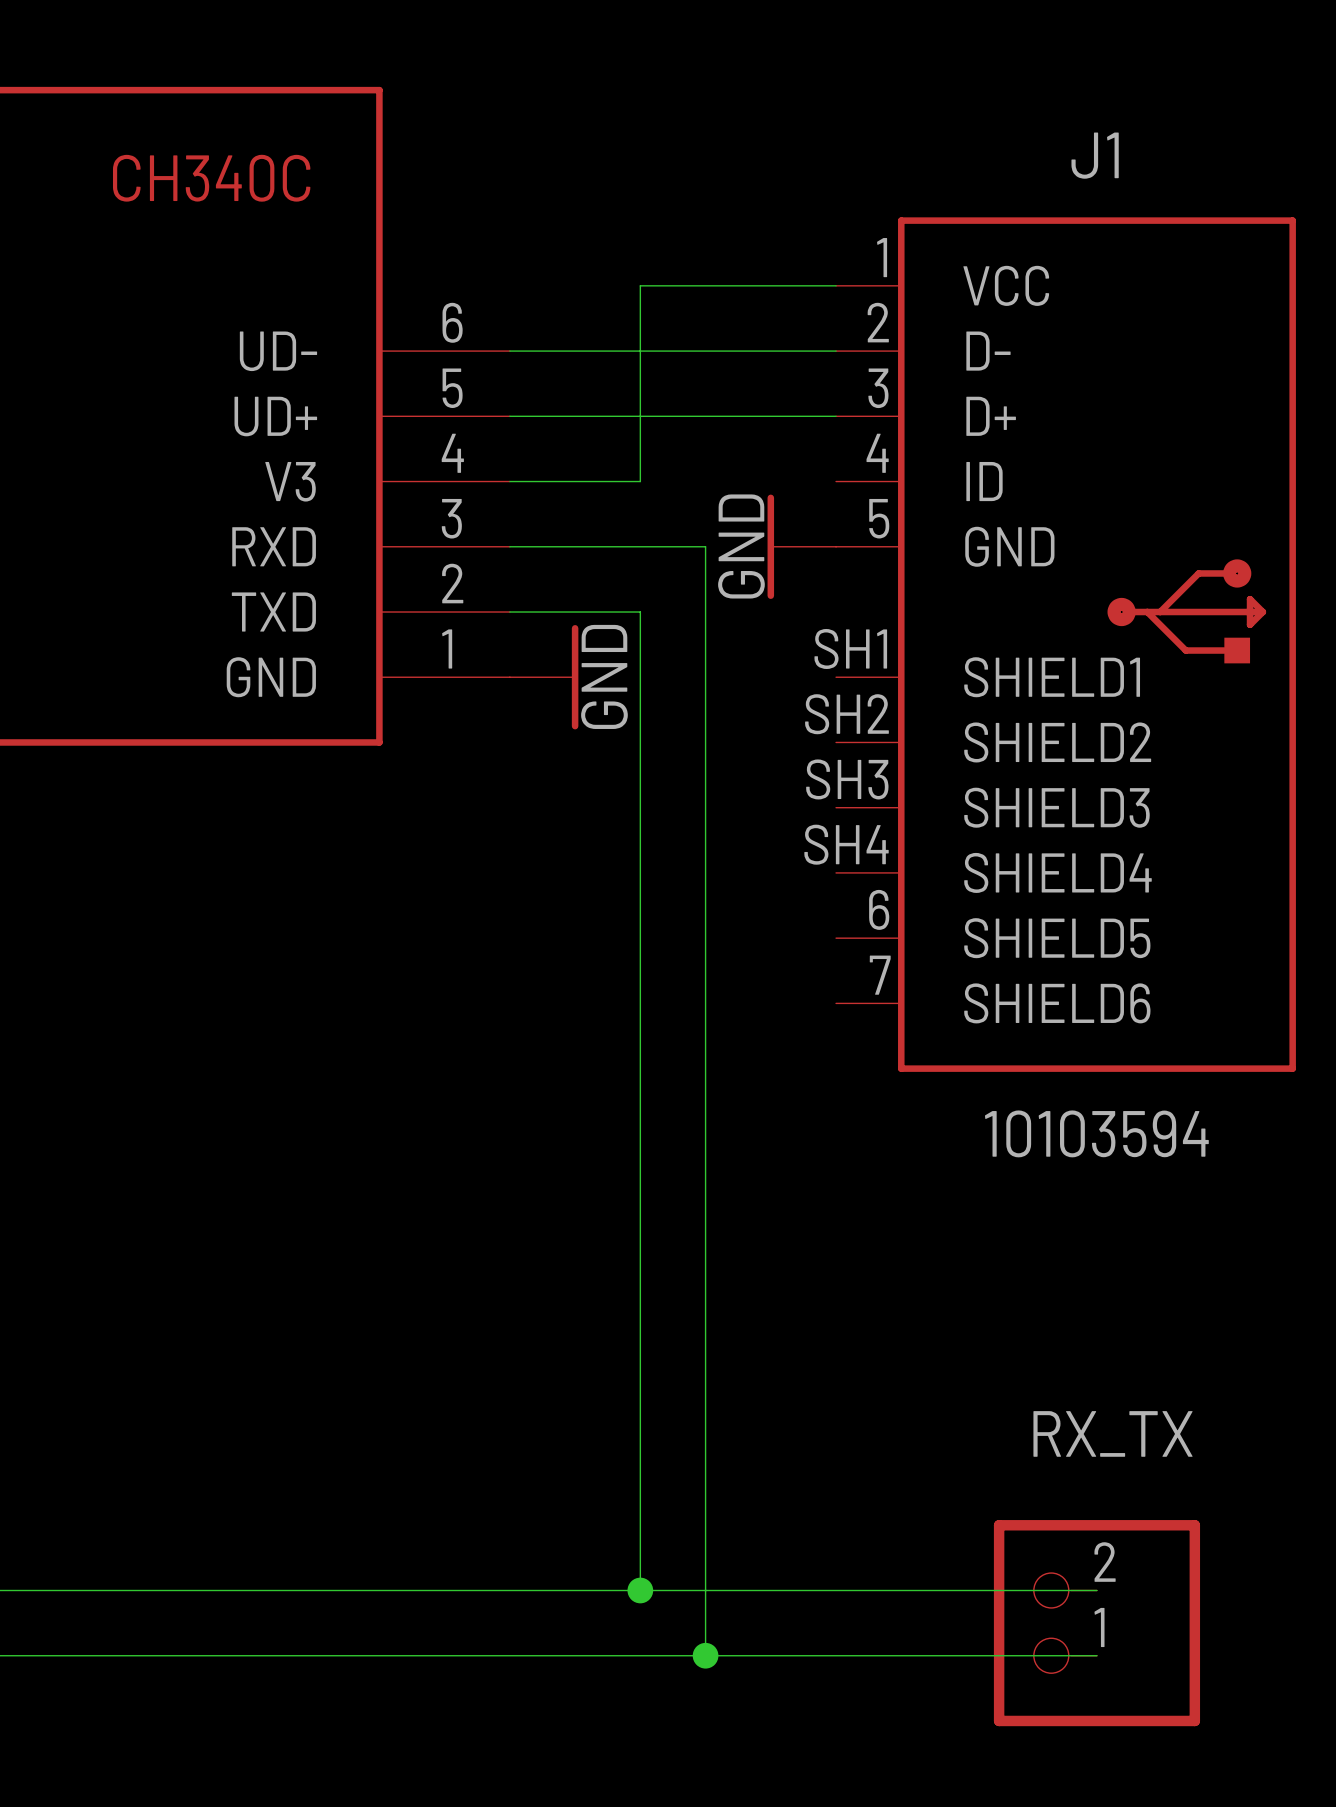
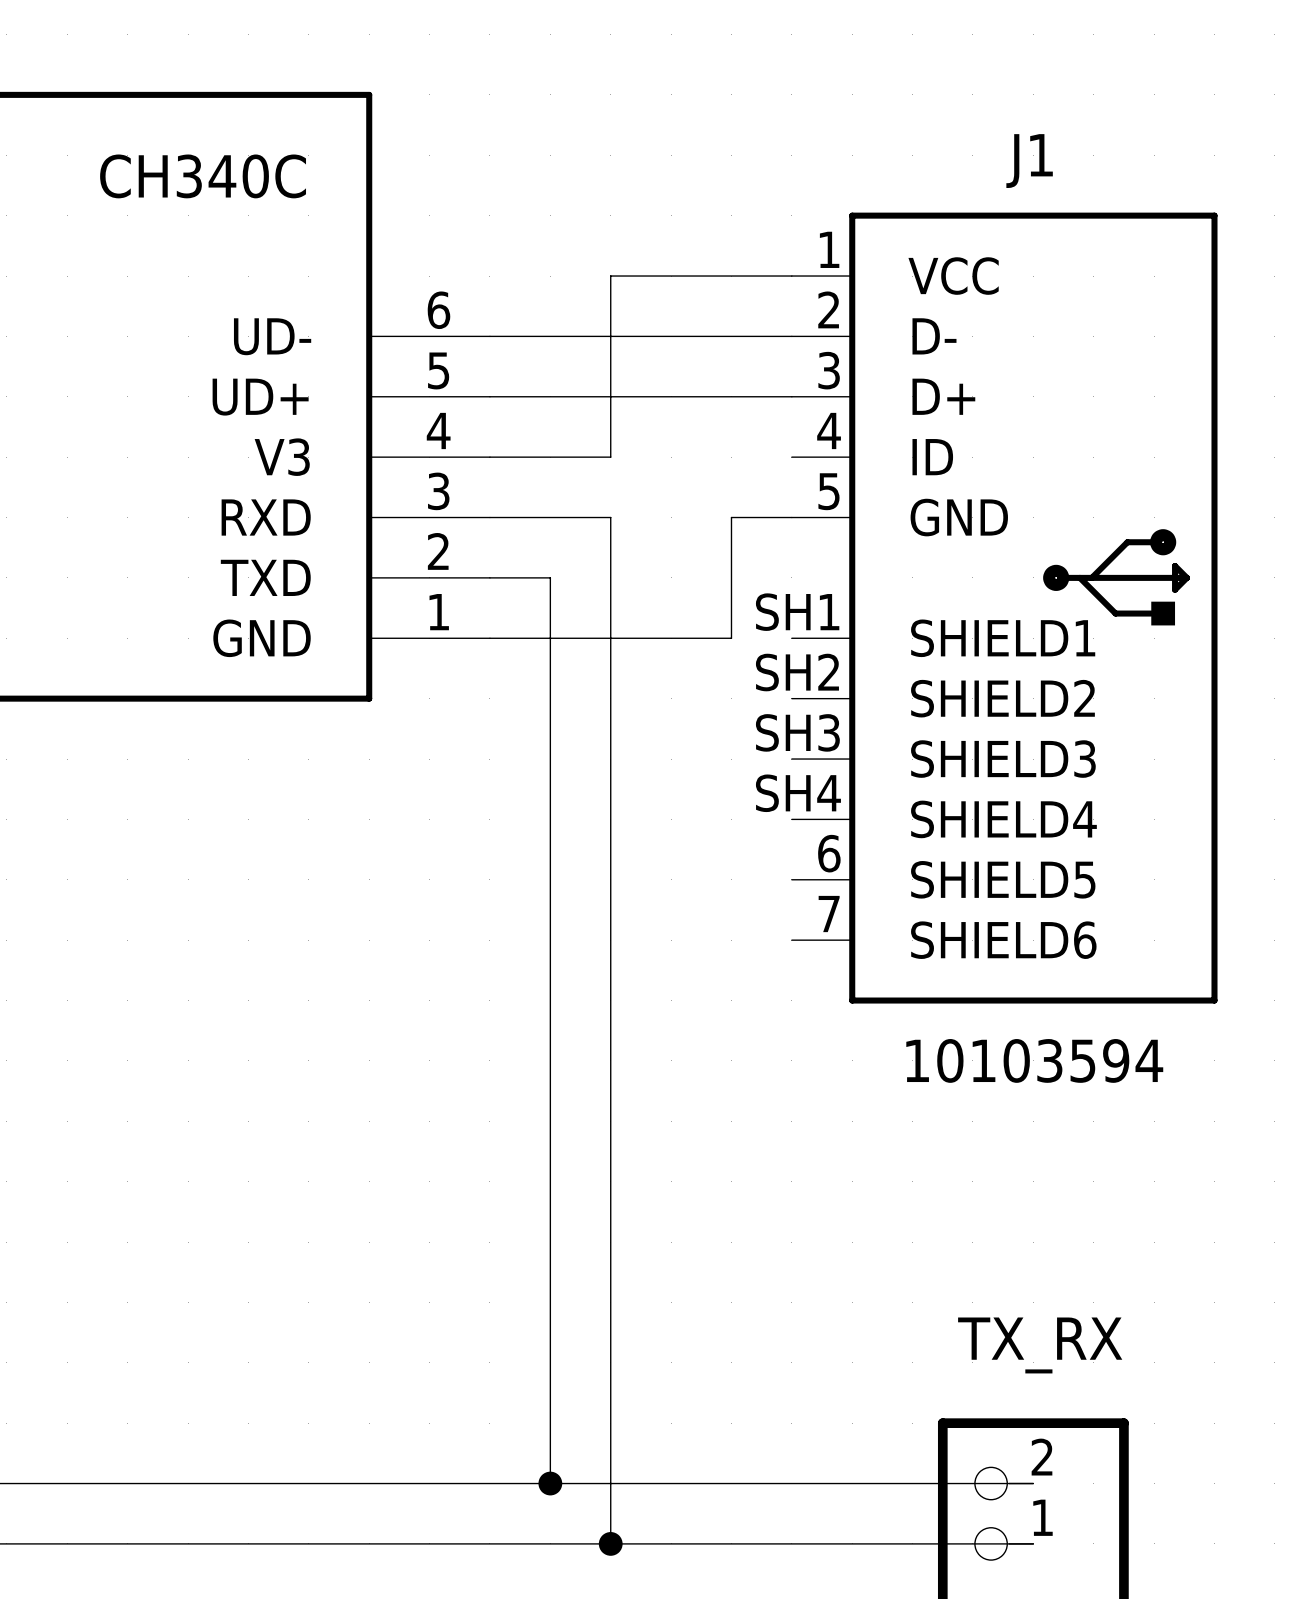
wire: (640, 546) (705, 546) (705, 1655) -> none
power symbol: GND (801, 546) -> none
wire: none -> (791, 517) (731, 517) (731, 638) (489, 638)
wire: (575, 612) (640, 612) -> (610, 517) (610, 577)
wire: none -> (550, 577) (550, 1483)
power symbol: GND (544, 677) -> none
RX_TX name: RX_TX (1113, 1433) -> TX_RX (1040, 1345)
junction: none -> (550, 1483)
wire: none -> (610, 1483) (610, 1543)
junction: (640, 1590) -> none
junction: none -> (610, 1543)
junction: (705, 1655) -> none

